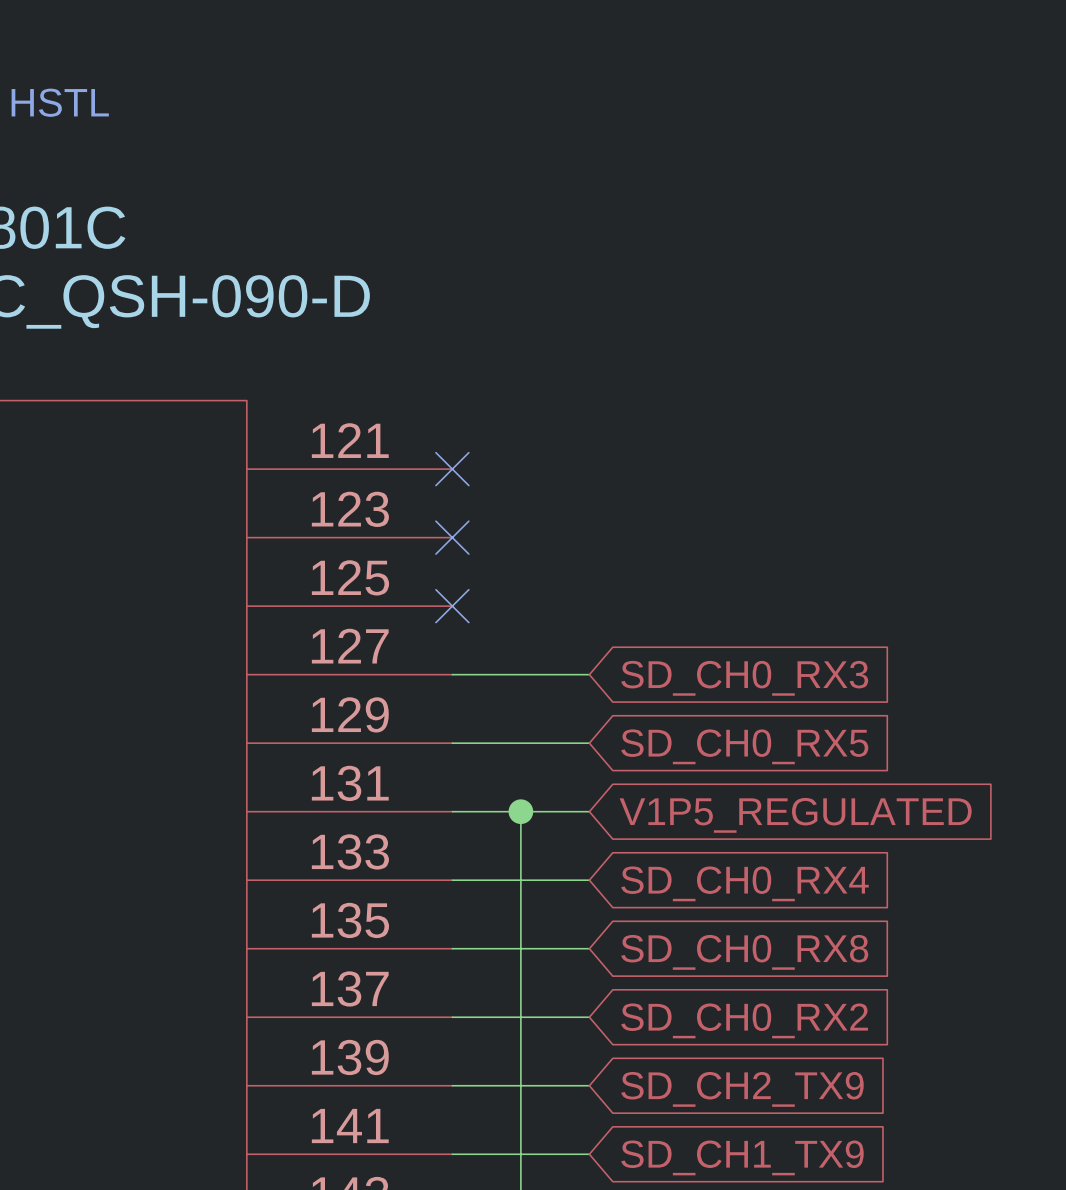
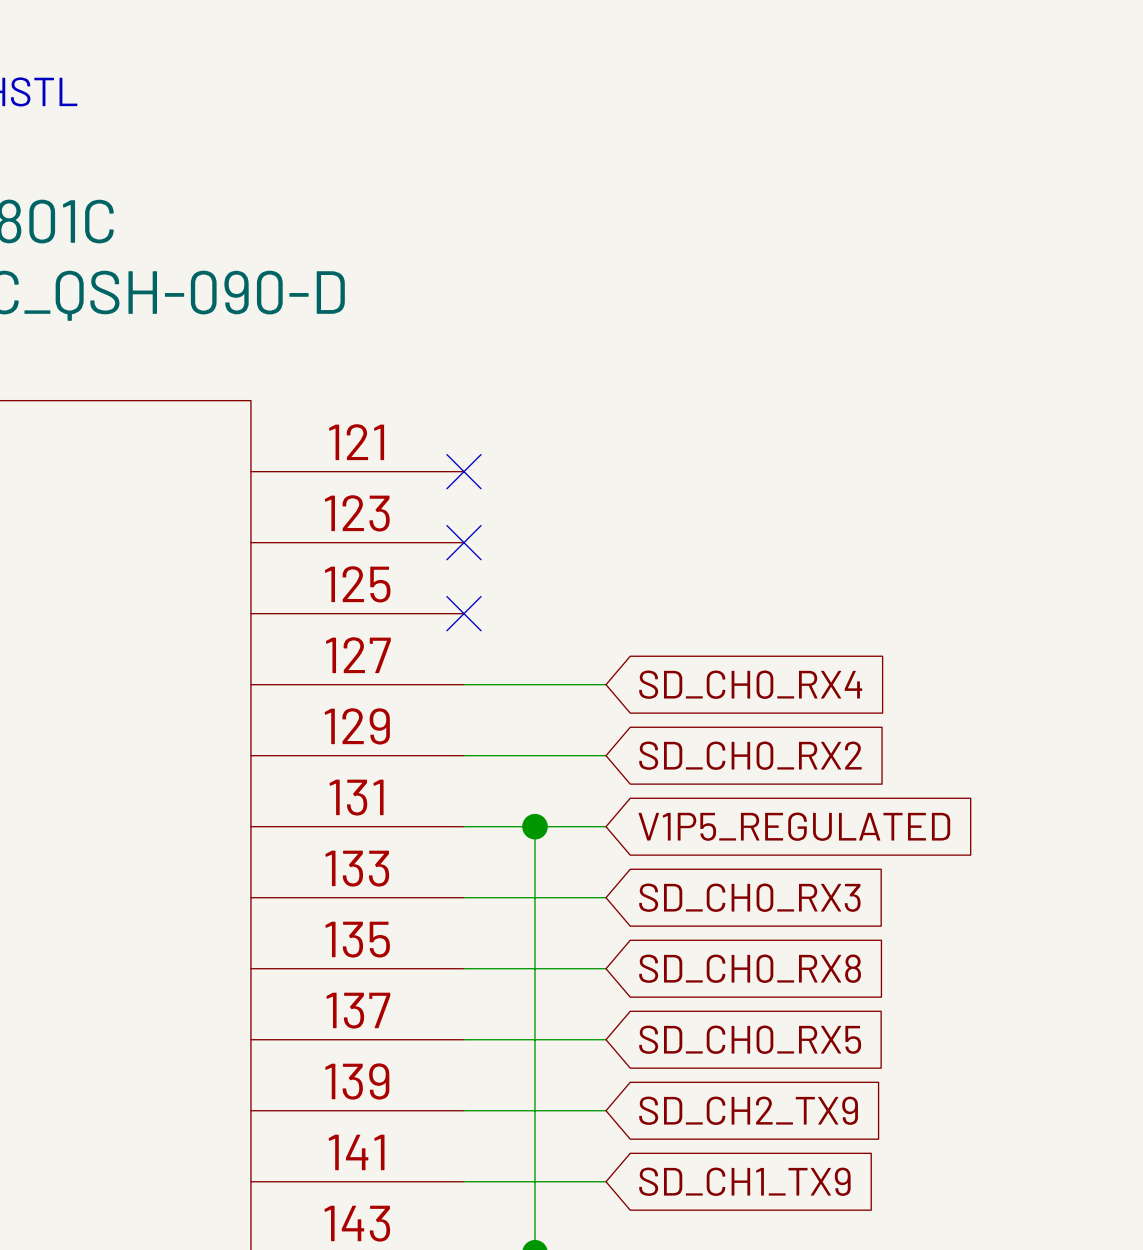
global label: SD_CH0_RX3 (744, 678) -> SD_CH0_RX4 (750, 684)
global label: SD_CH0_RX5 (744, 746) -> SD_CH0_RX2 (750, 755)
global label: SD_CH0_RX4 (744, 883) -> SD_CH0_RX3 (749, 897)
global label: SD_CH0_RX2 (744, 1020) -> SD_CH0_RX5 (750, 1039)

